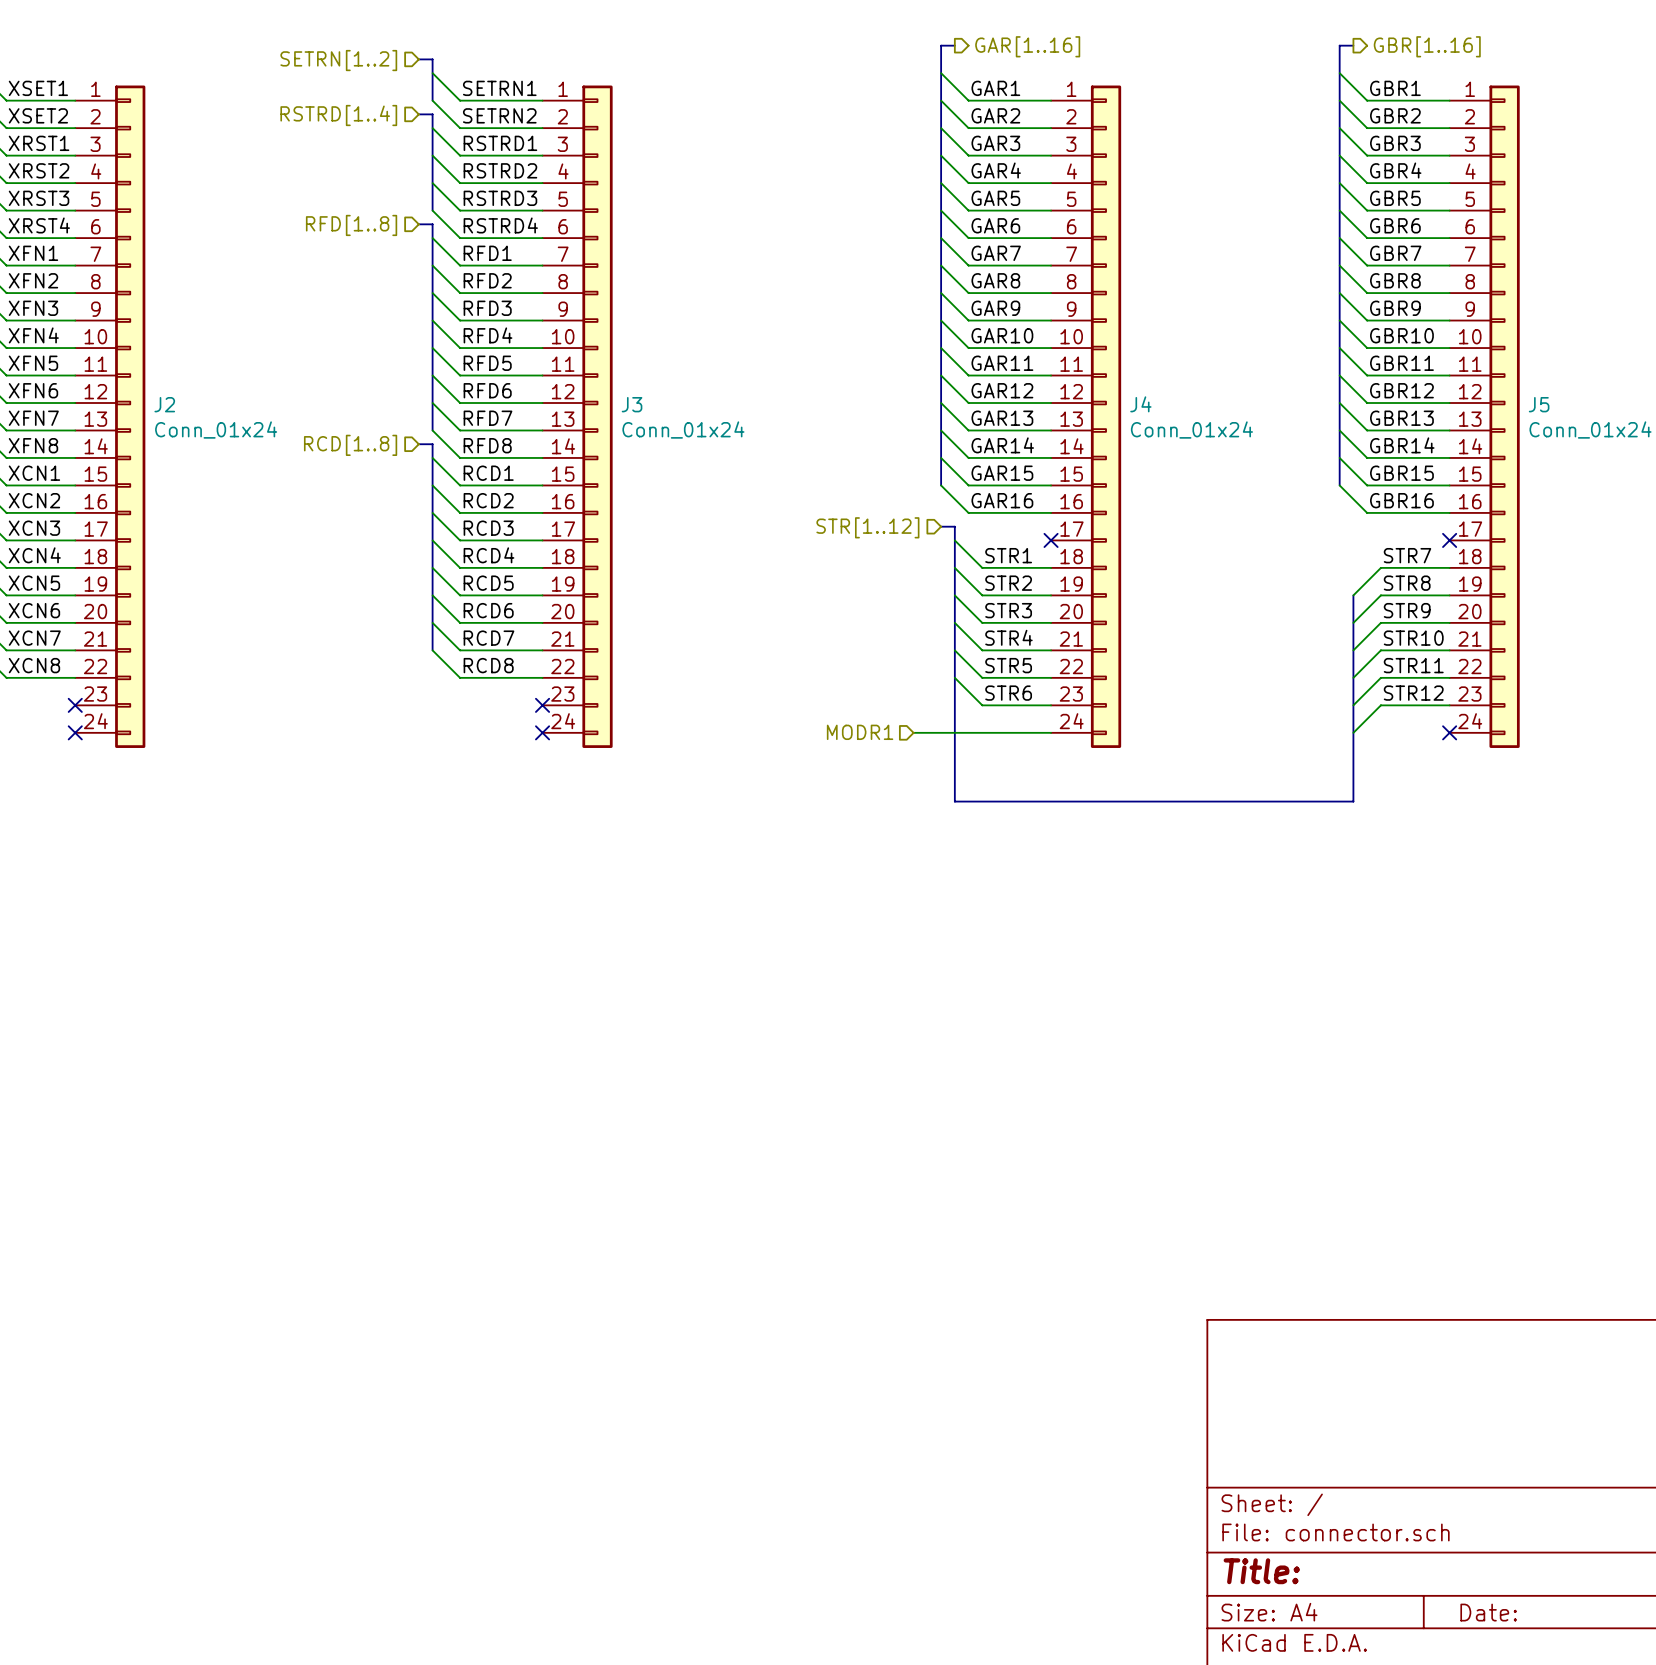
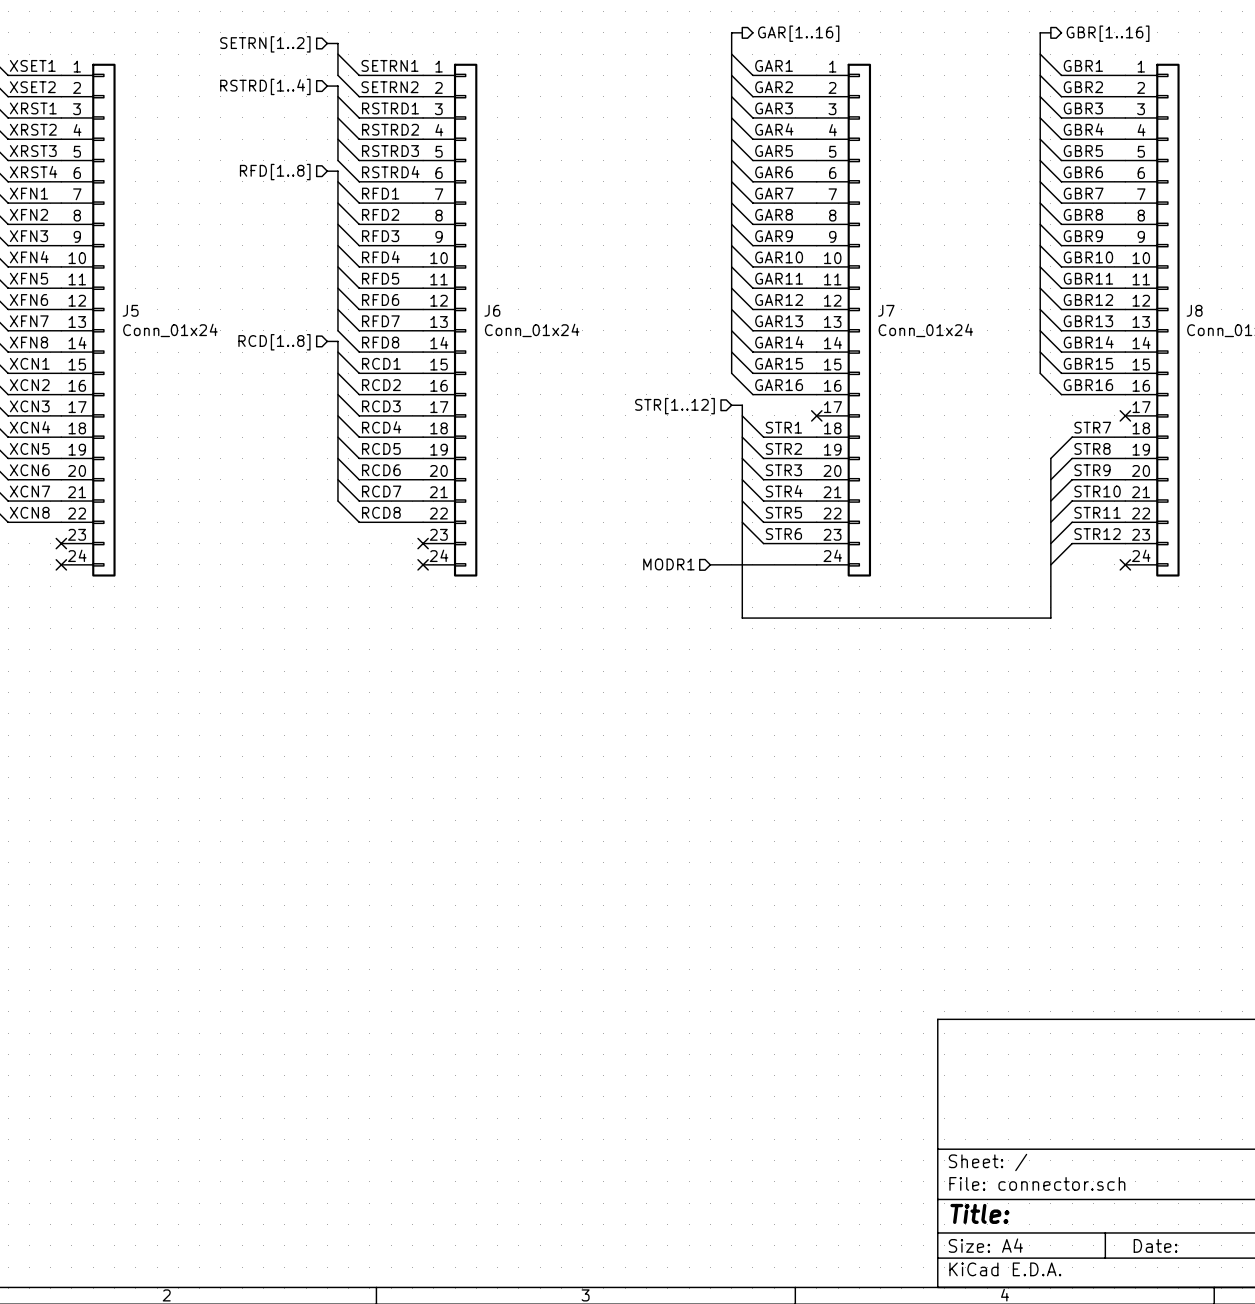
J2 name: J2 (164, 404) -> J5 (130, 310)
J3 name: J3 (632, 404) -> J6 (492, 310)
J4 name: J4 (1140, 404) -> J7 (886, 310)
J5 name: J5 (1539, 404) -> J8 (1194, 310)

